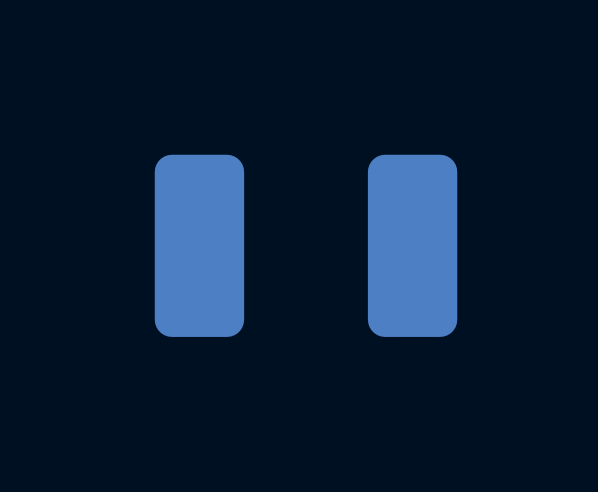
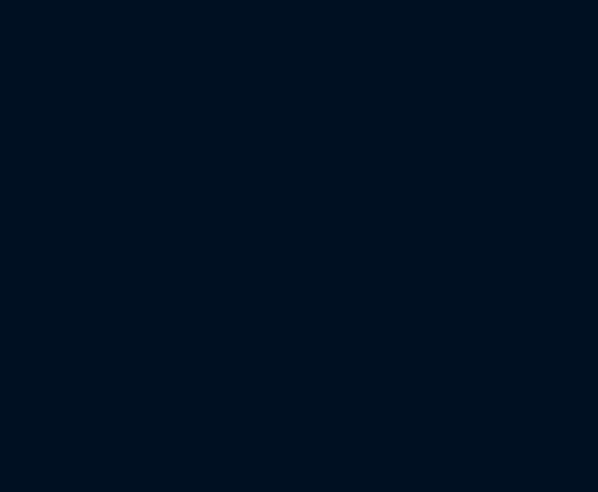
part: (306, 245) -> none

